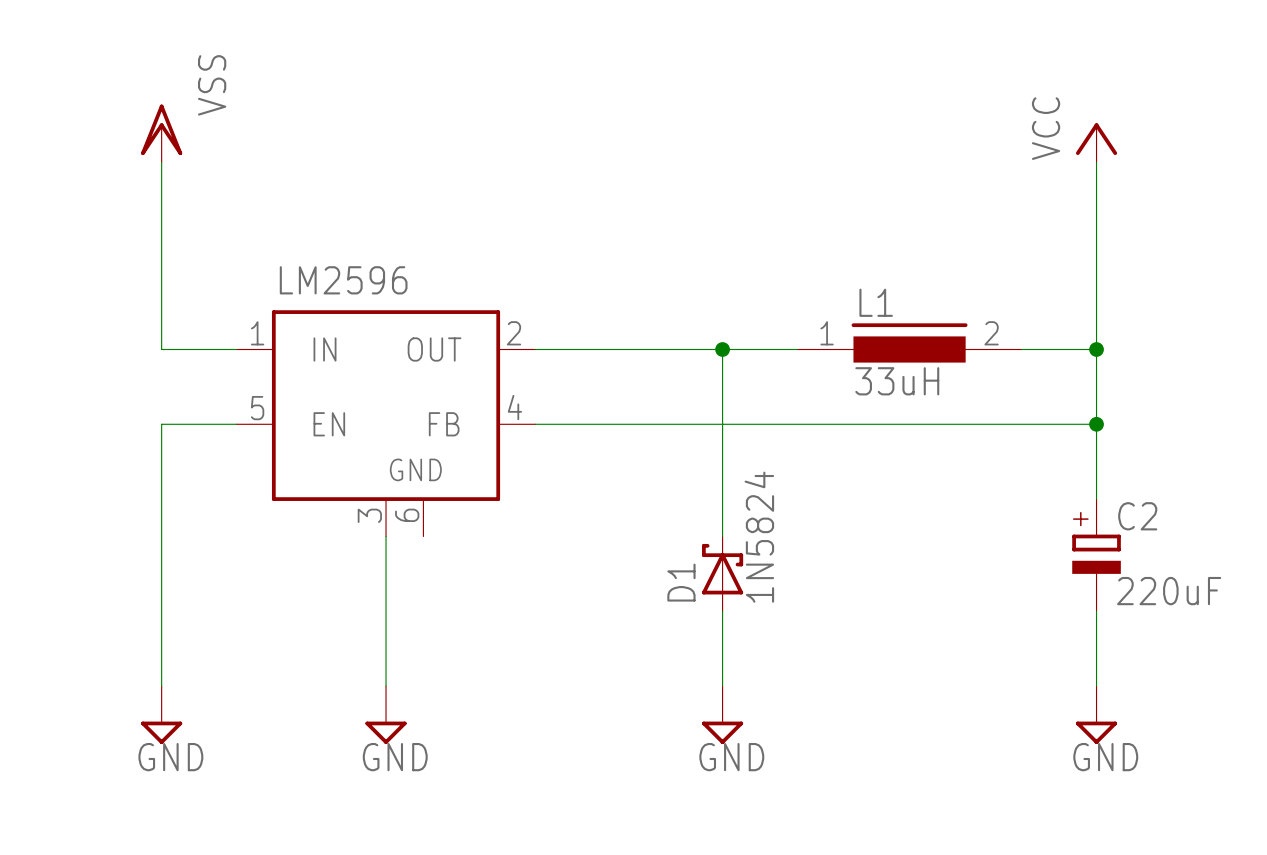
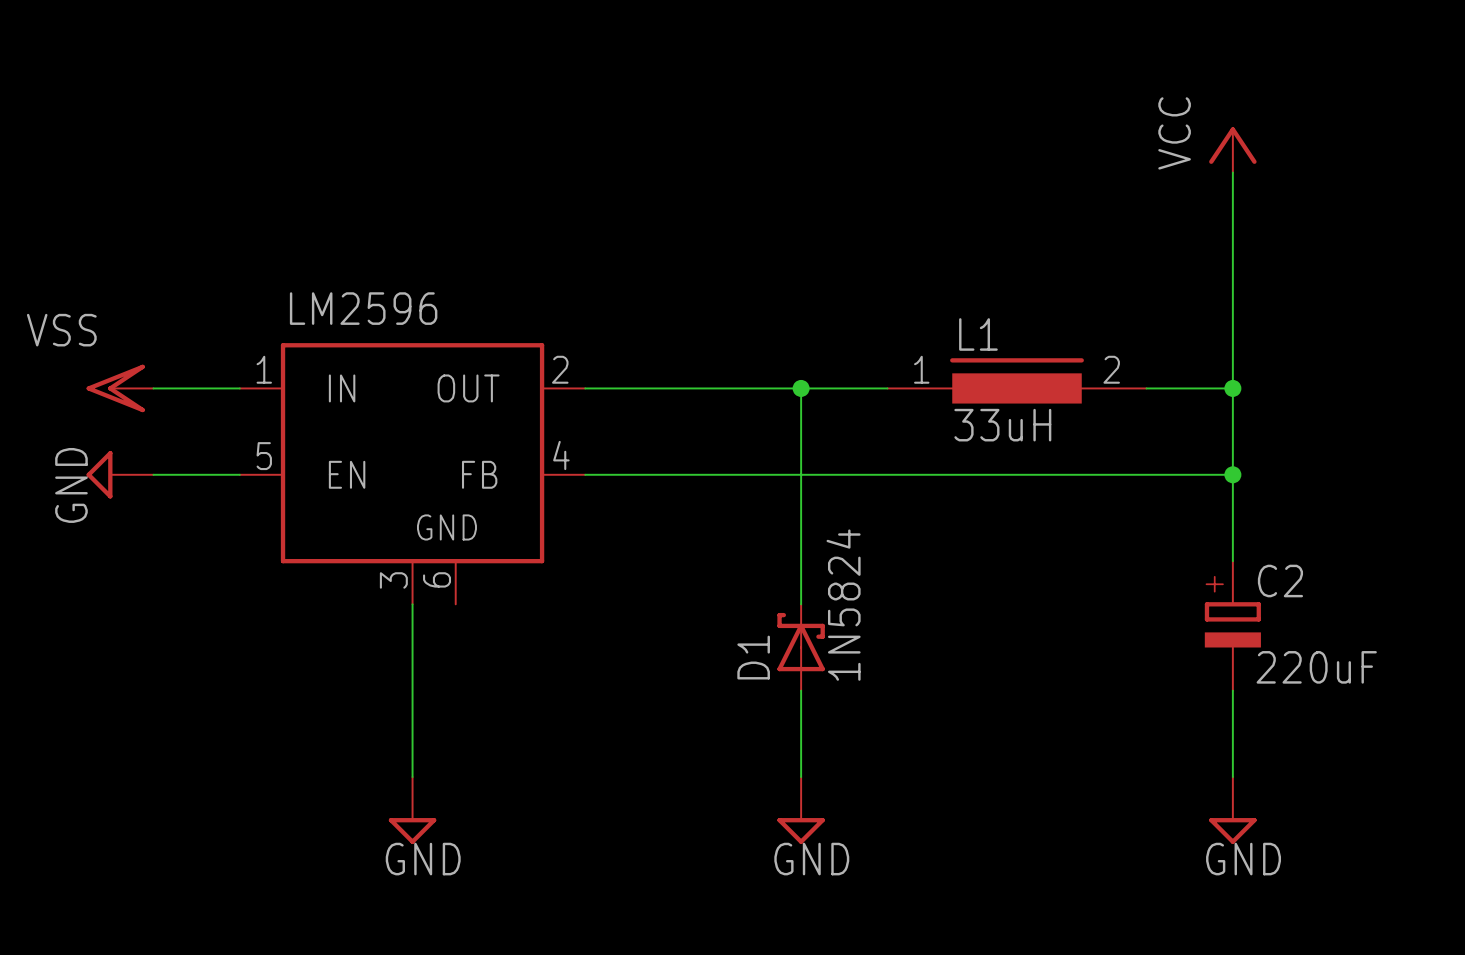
power symbol rotation: 0° (161, 129) -> 90° counterclockwise (115, 388)
power symbol position: VSS (161, 133) -> VSS (120, 388)
wire: (161, 162) (161, 349) -> none
wire: (161, 424) (161, 686) -> none
power symbol position: GND (161, 715) -> GND (120, 474)
power symbol rotation: 0° (161, 732) -> 90° clockwise (99, 474)

